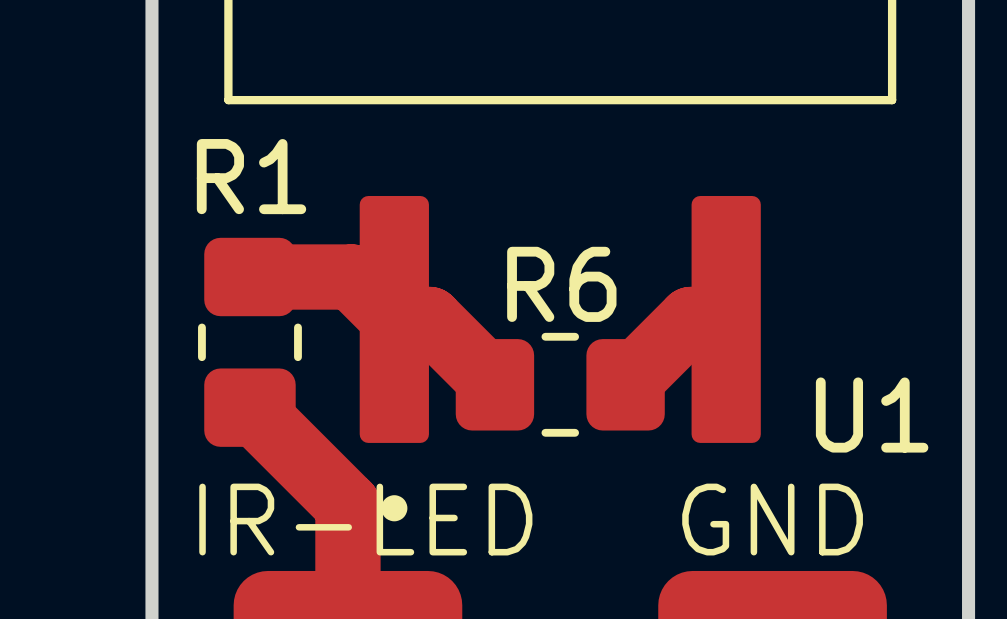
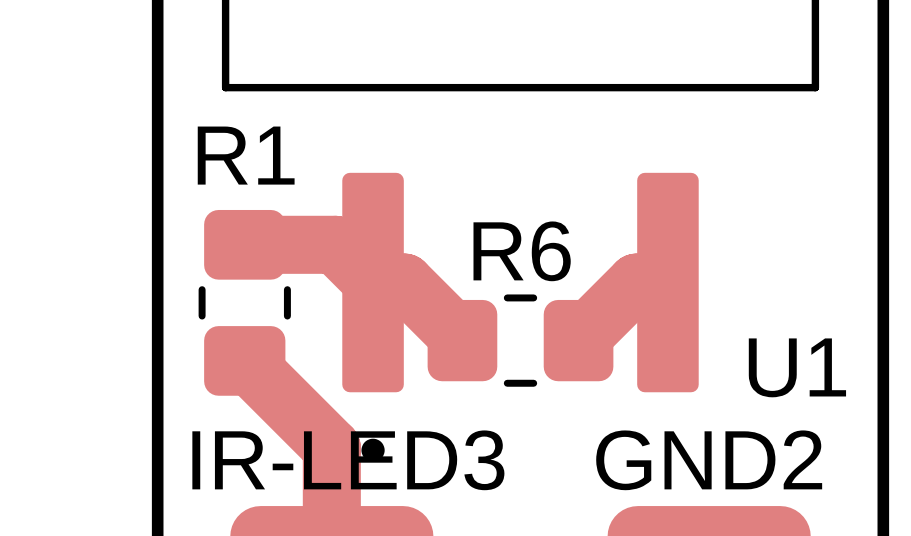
IR-LED name: IR-LED (365, 519) -> IR-LED3 (348, 460)
GND name: GND (772, 519) -> GND2 (709, 460)

